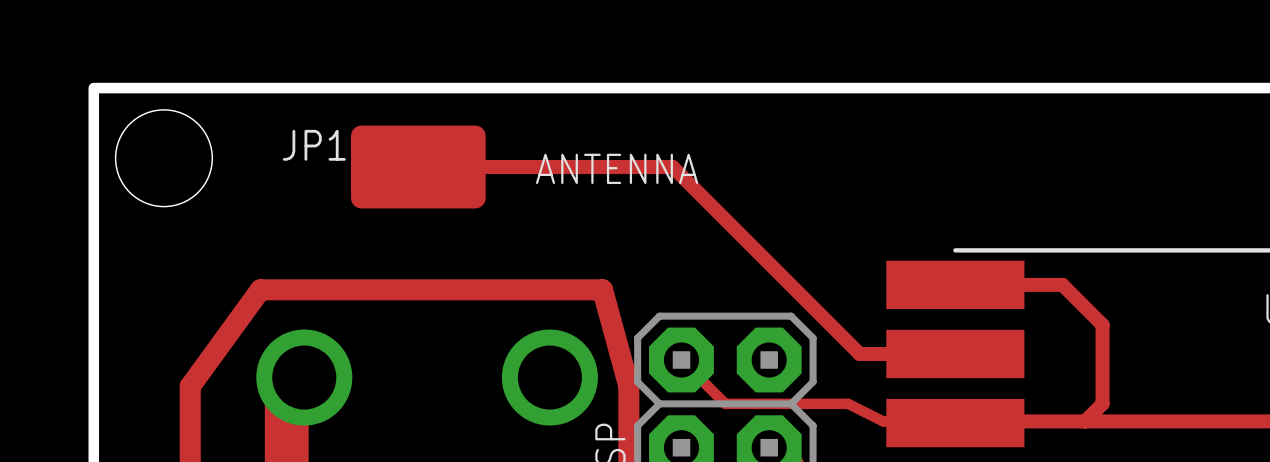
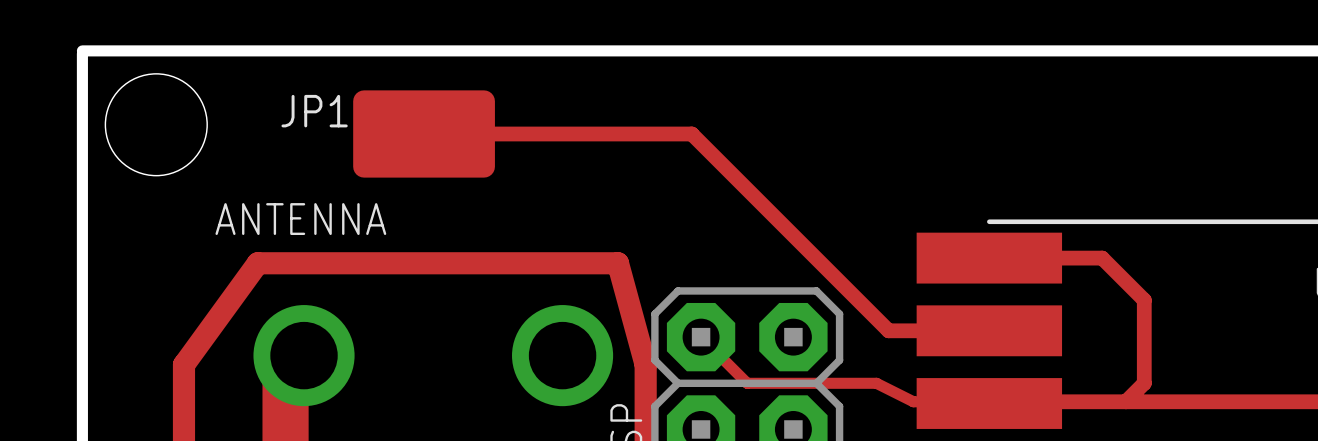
JP1 value position: ANTENNA (617, 168) -> ANTENNA (300, 219)

